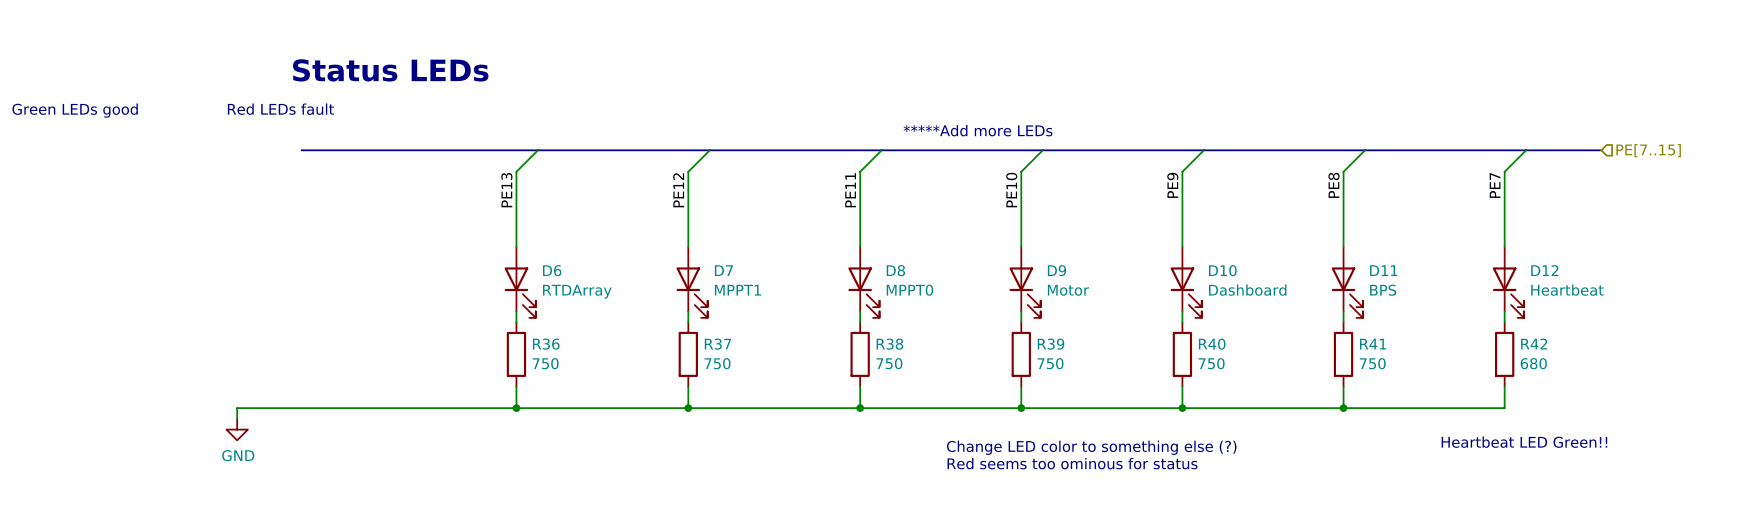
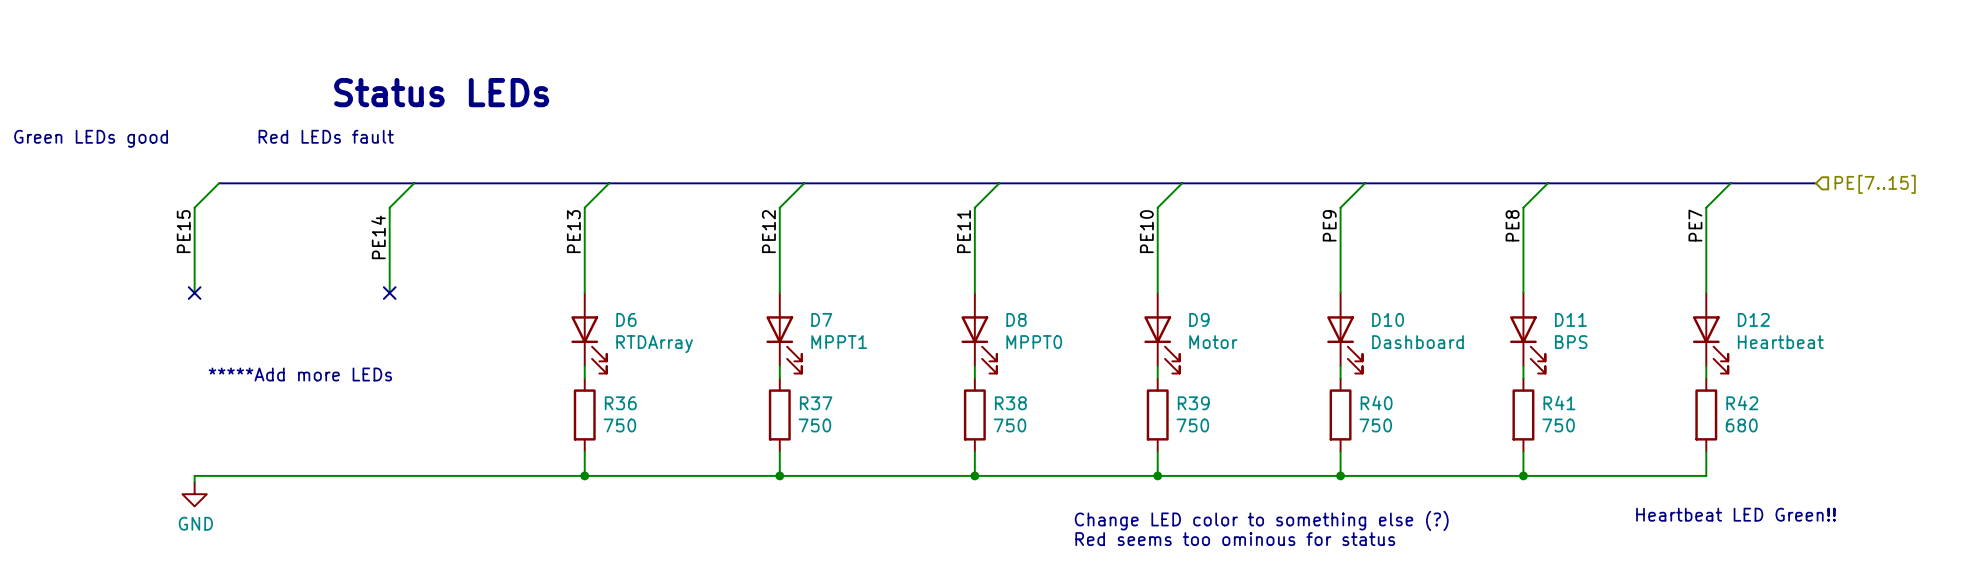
text: *****Add more LEDs (978, 130) -> none
wire: none -> (219, 183) (194, 207) (194, 293)
bus: none -> (219, 183) (340, 183)
wire: none -> (414, 183) (389, 207)
wire: none -> (389, 207) (389, 293)
label: none -> PE15 (183, 231)
label: none -> PE14 (378, 237)
no-connect mark: none -> (194, 293)
no-connect mark: none -> (389, 293)
text: none -> *****Add more LEDs (300, 374)
wire: (237, 408) (237, 418) -> (267, 475) (194, 475) (194, 482)
power symbol position: GND (237, 429) -> GND (194, 494)

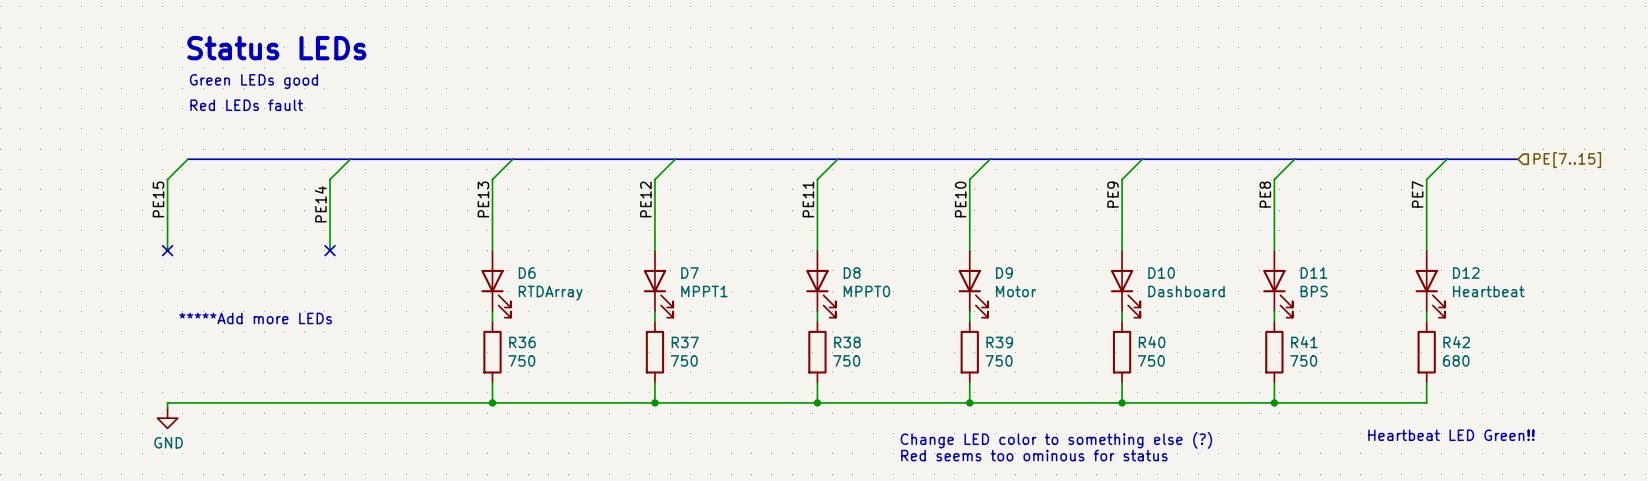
text position: Status LEDs (441, 92) -> Status LEDs (276, 48)
text position: Red LEDs fault (326, 136) -> Red LEDs fault (246, 105)
text position: Green LEDs good (91, 138) -> Green LEDs good (253, 81)

